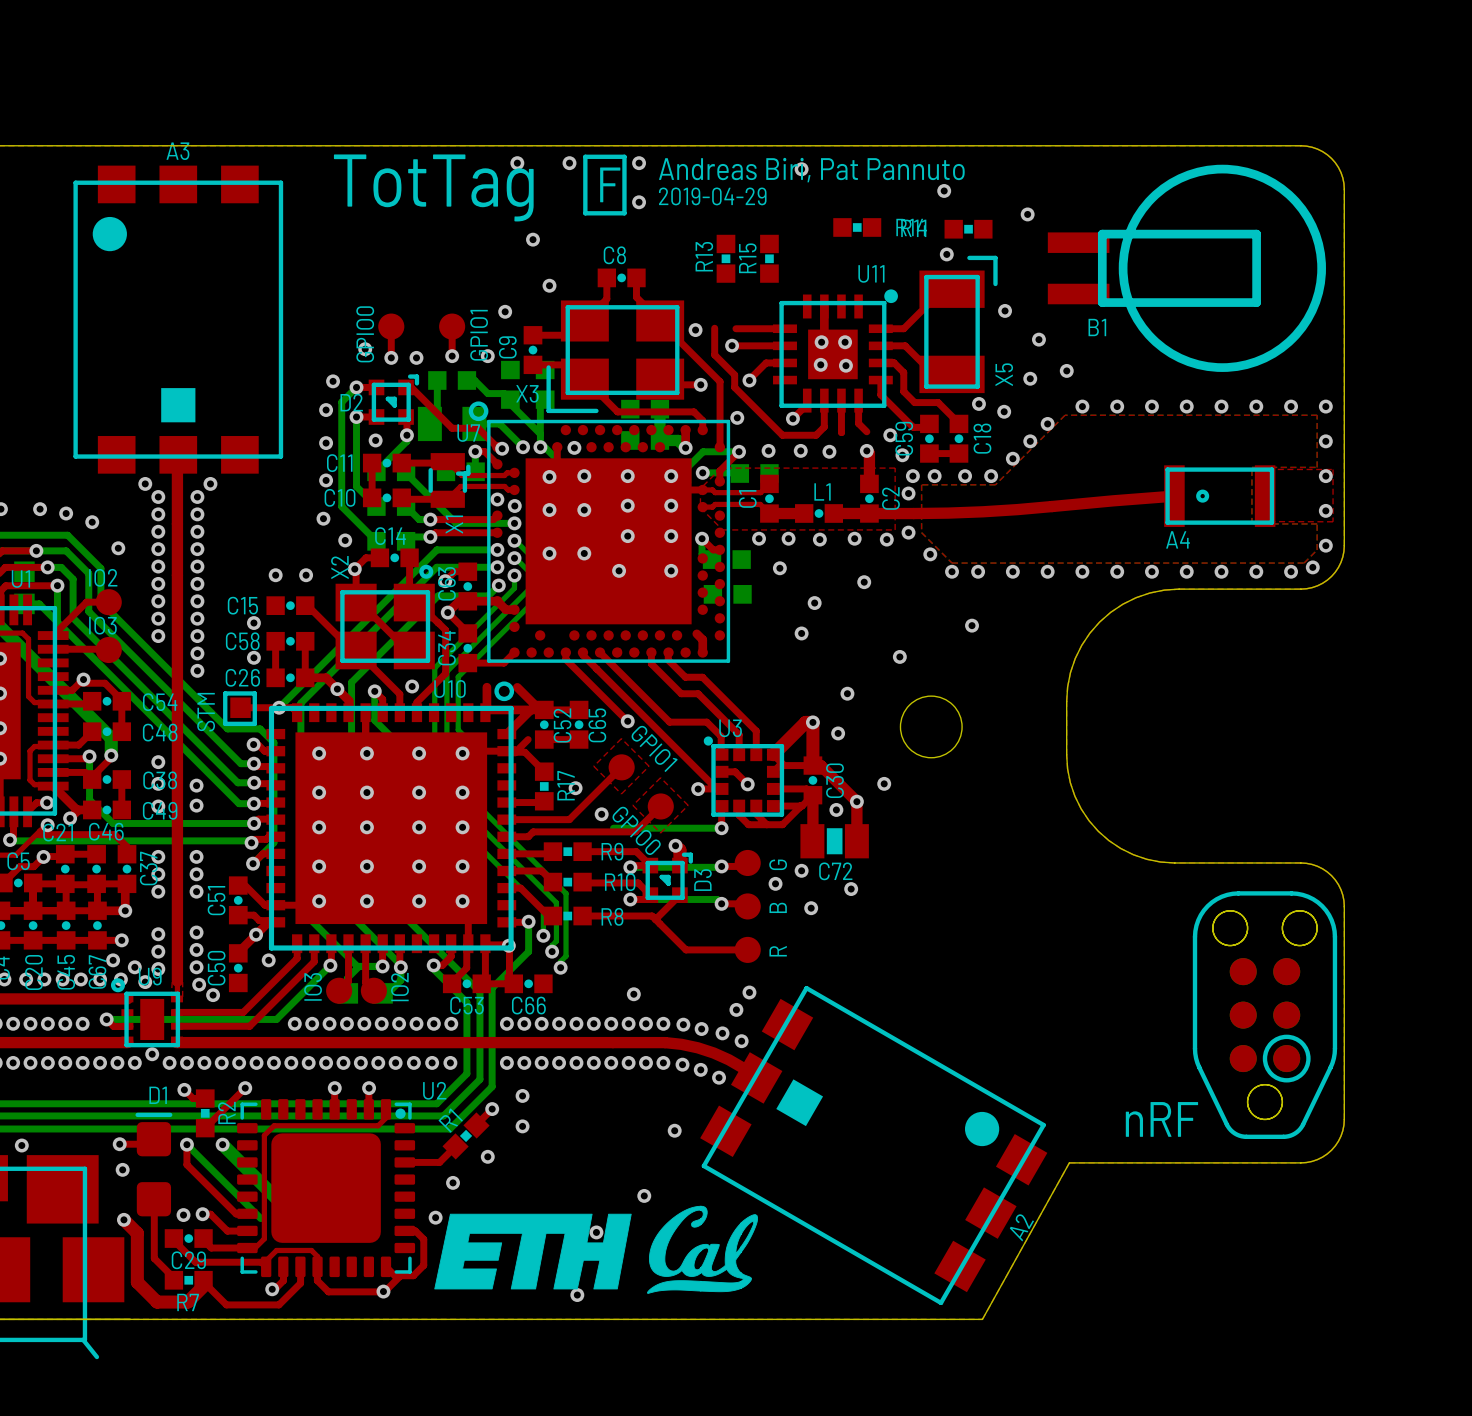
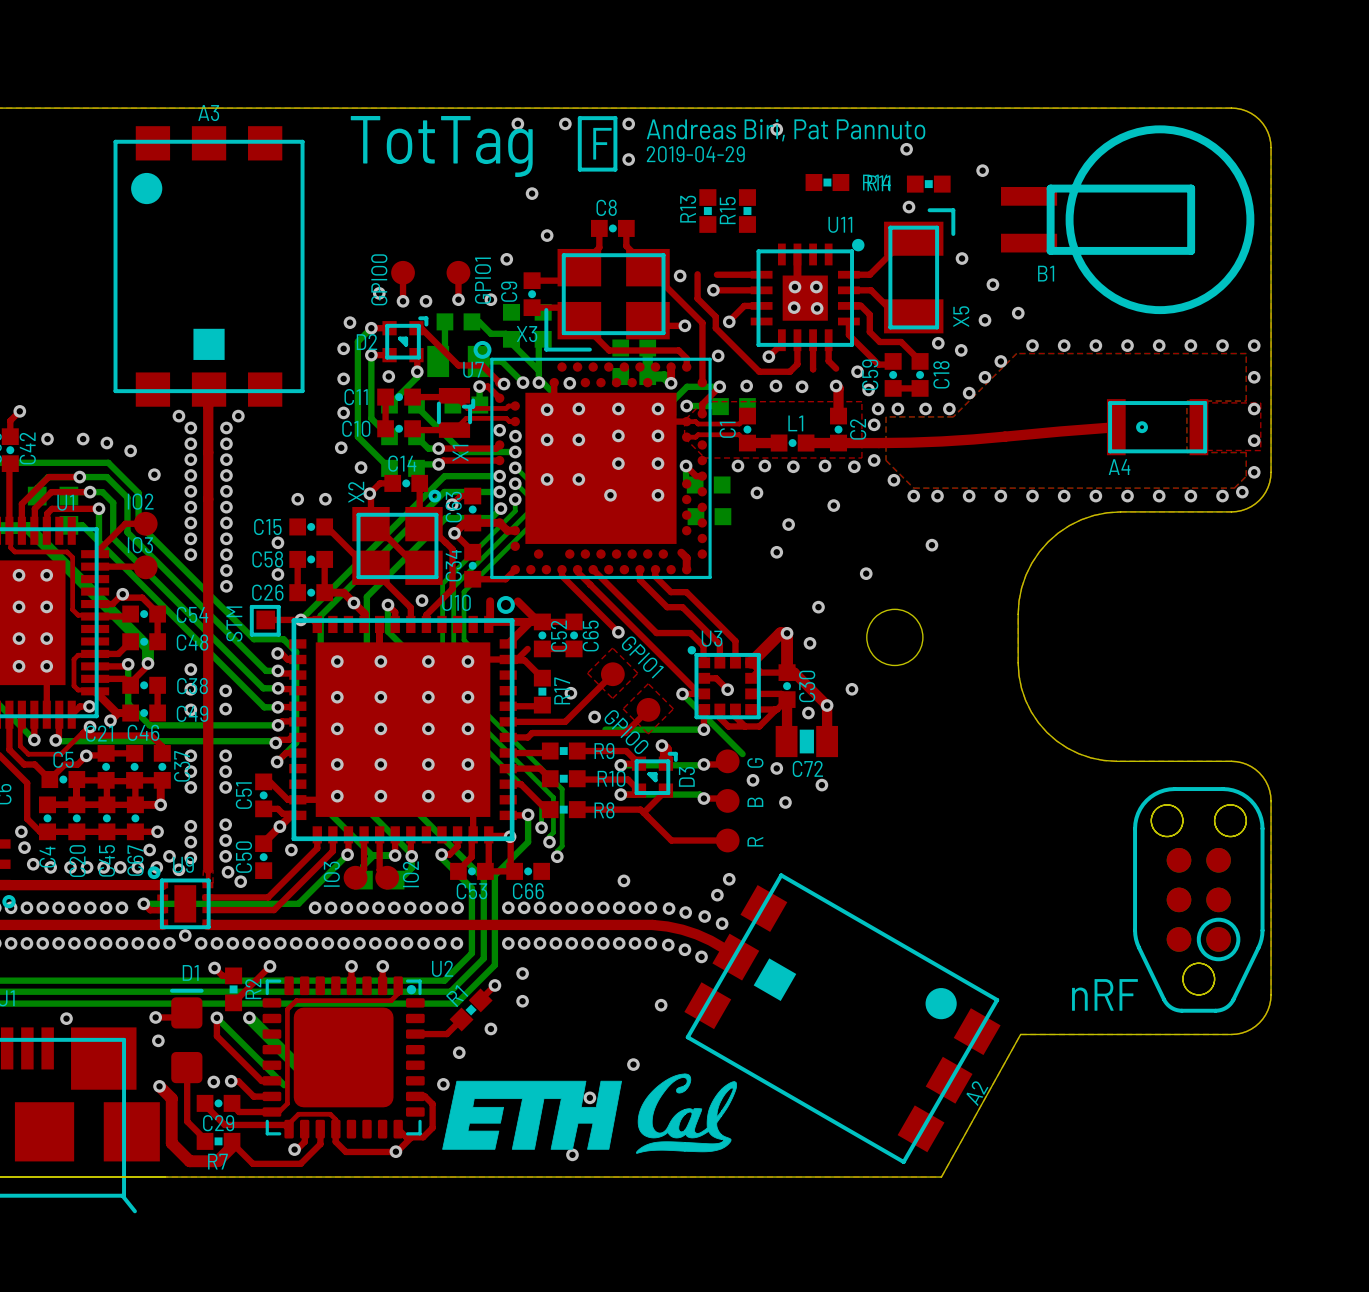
bottom track: none -> (682, 694) (742, 754)

